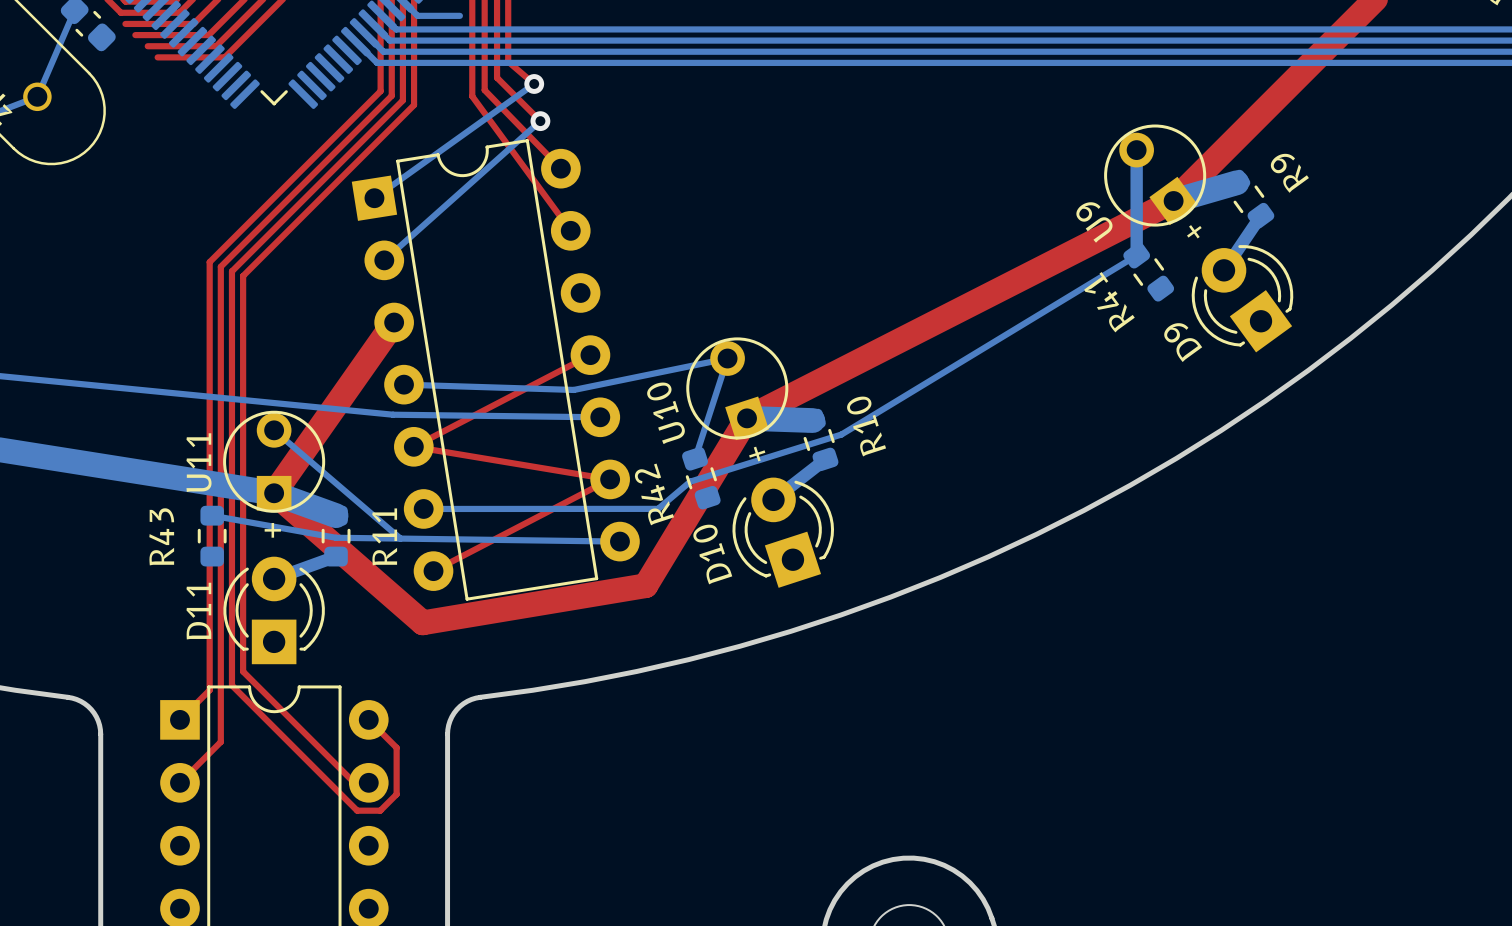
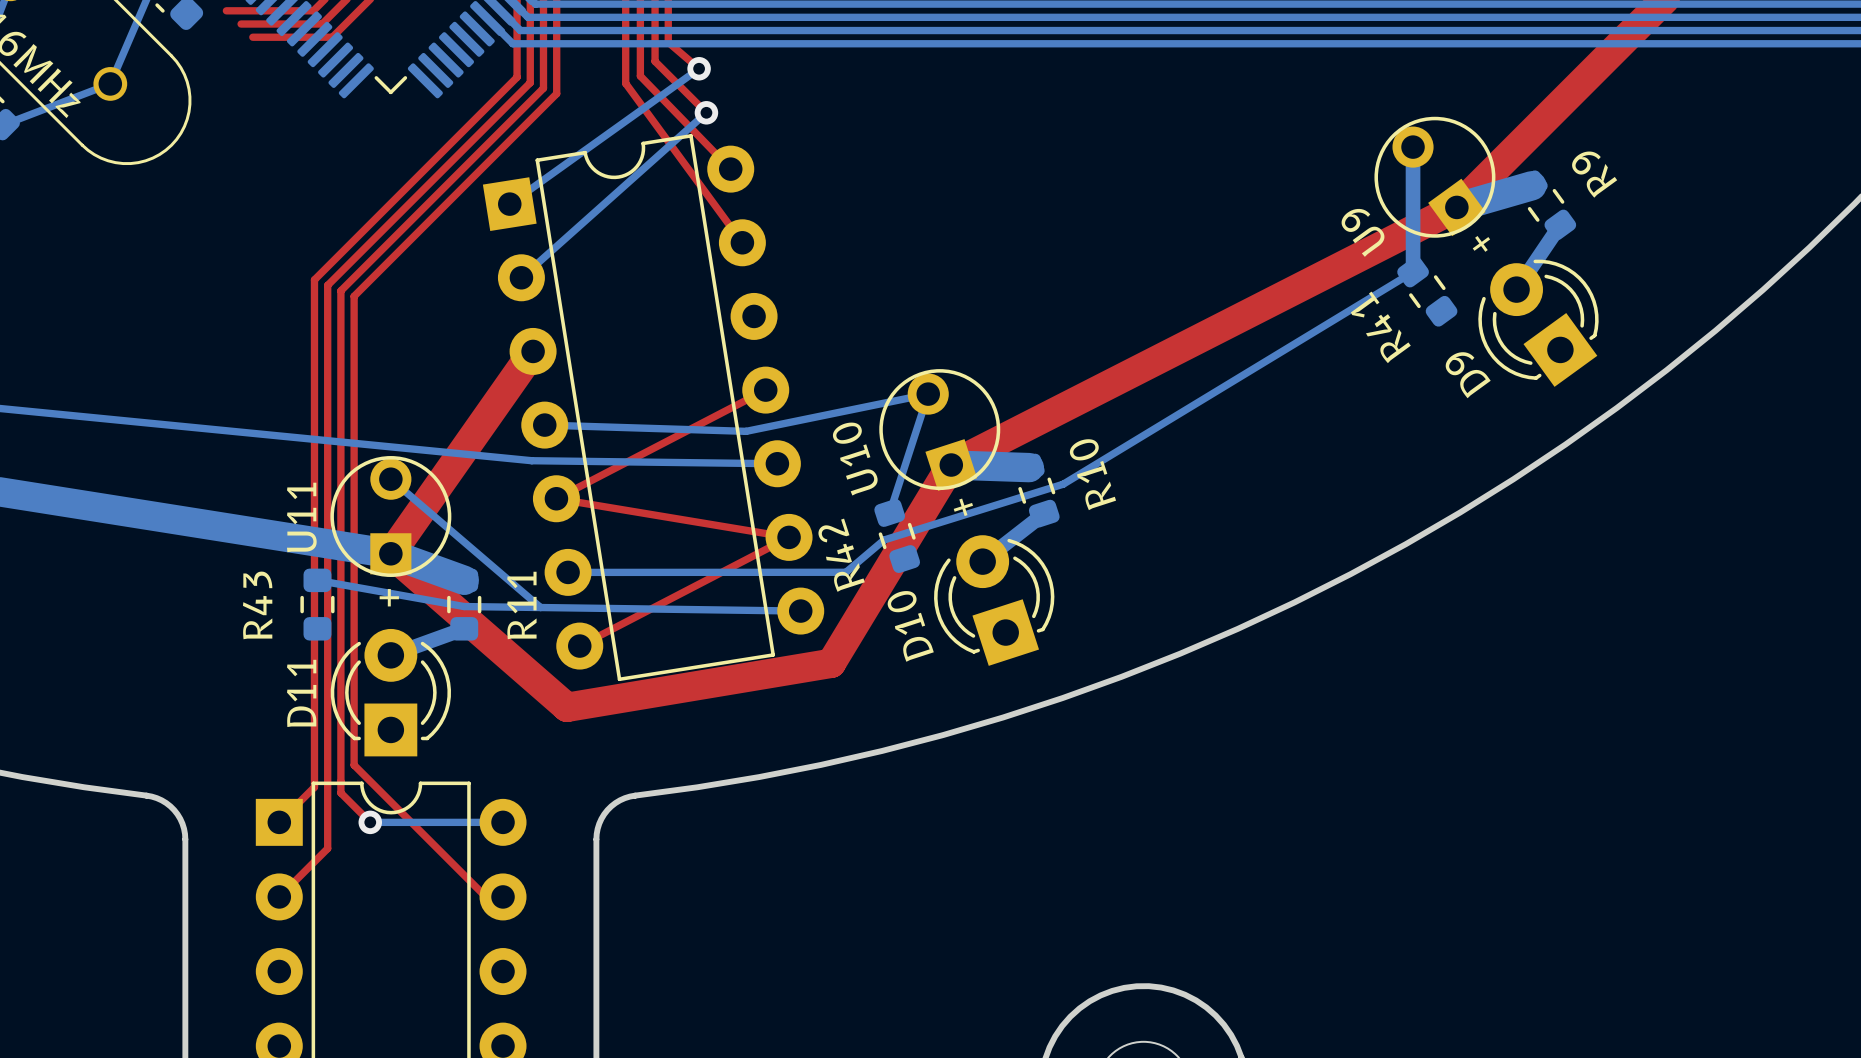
top track: (231, 685) (357, 810) (380, 810) (396, 794) (396, 747) (368, 719) -> (340, 781) (340, 793) (370, 822)
via: none -> (370, 822)
bottom track: none -> (503, 822) (370, 822)

